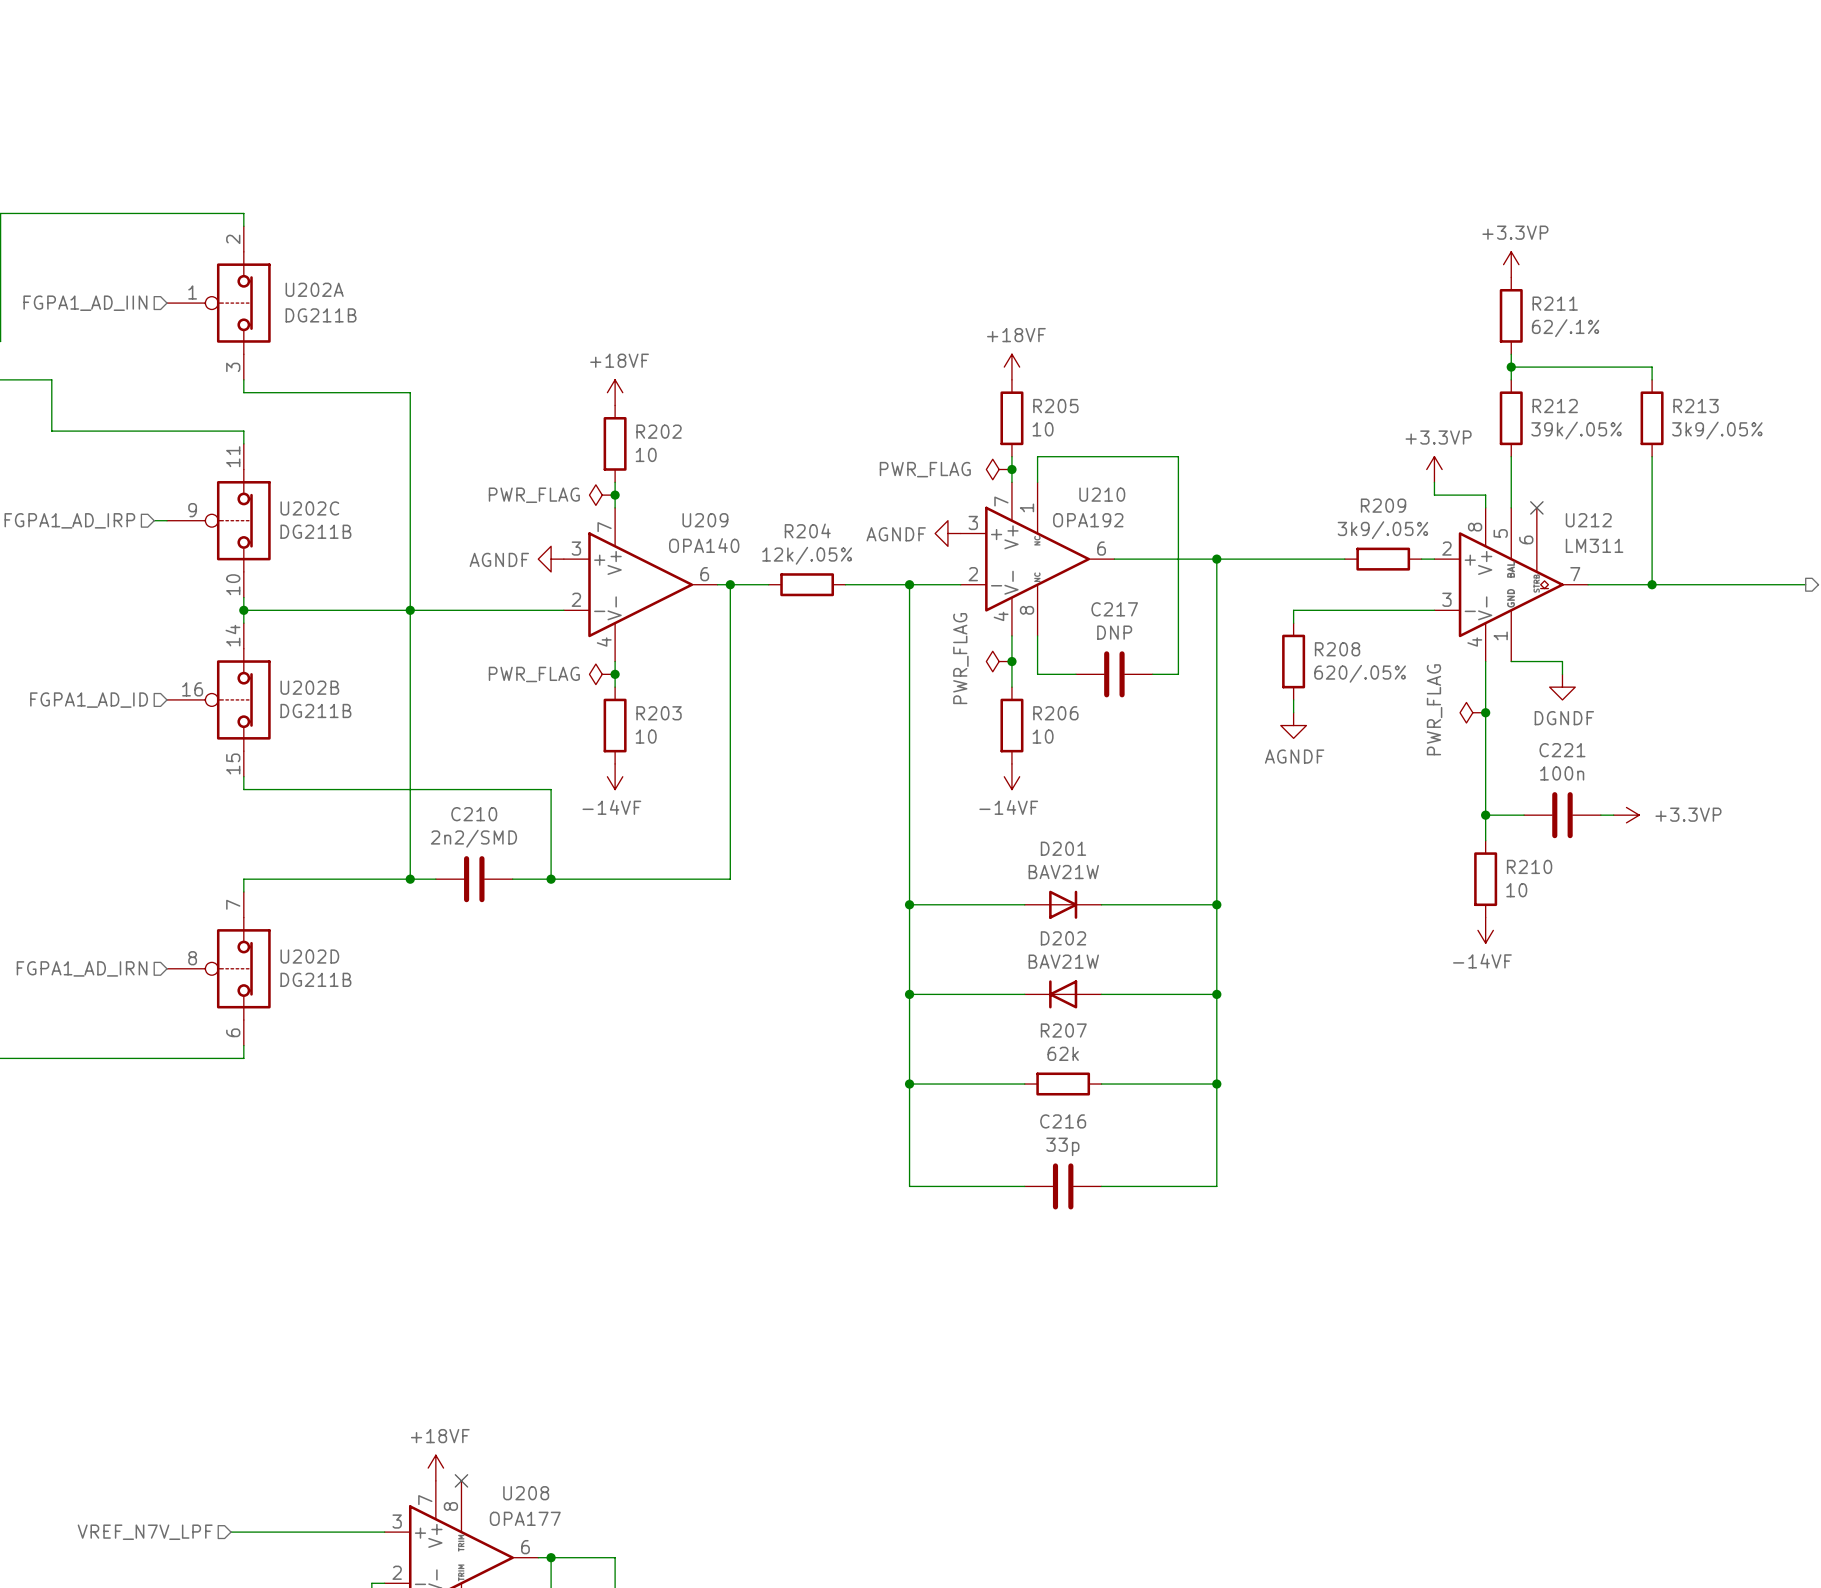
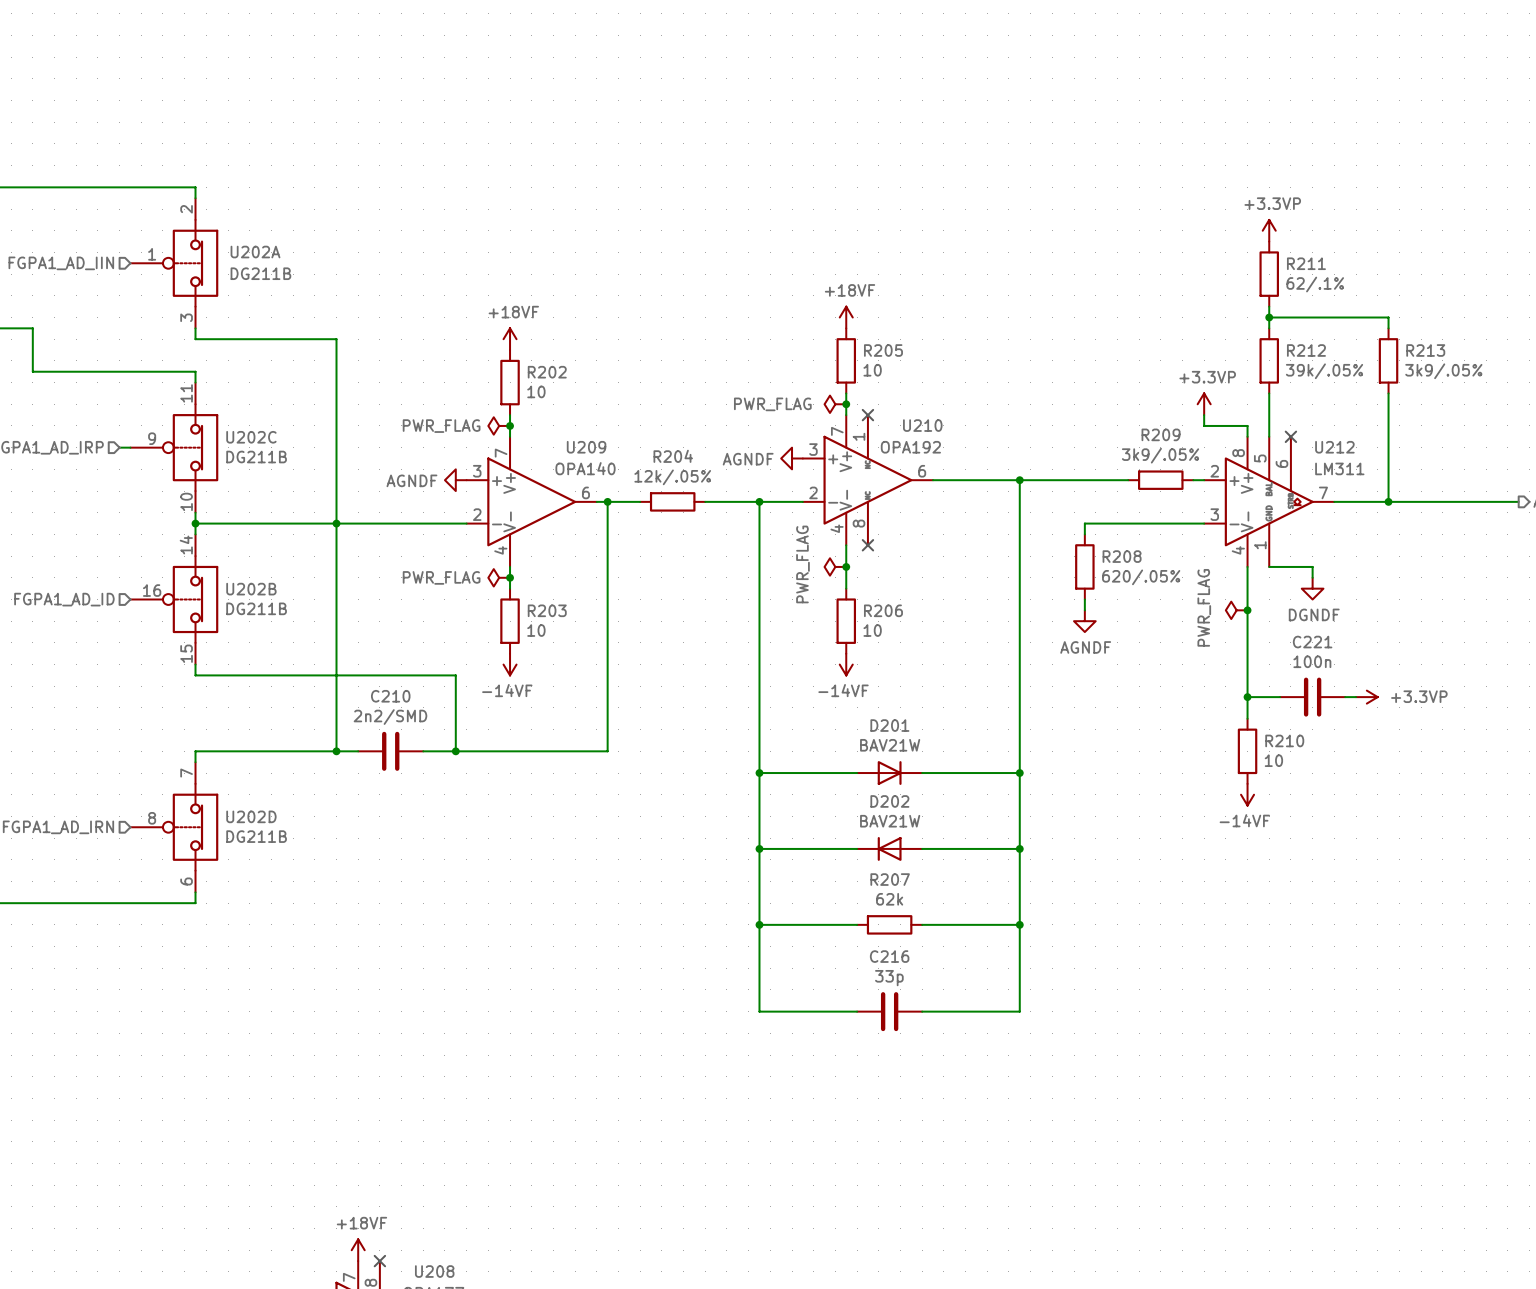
wire: (1037, 482) (1037, 456) (1178, 456) (1178, 674) (1152, 674) -> none
no-connect mark: none -> (867, 415)
wire: (1037, 635) (1037, 674) (1075, 674) -> none
no-connect mark: none -> (867, 545)
C217: DNP (1114, 674) -> none

